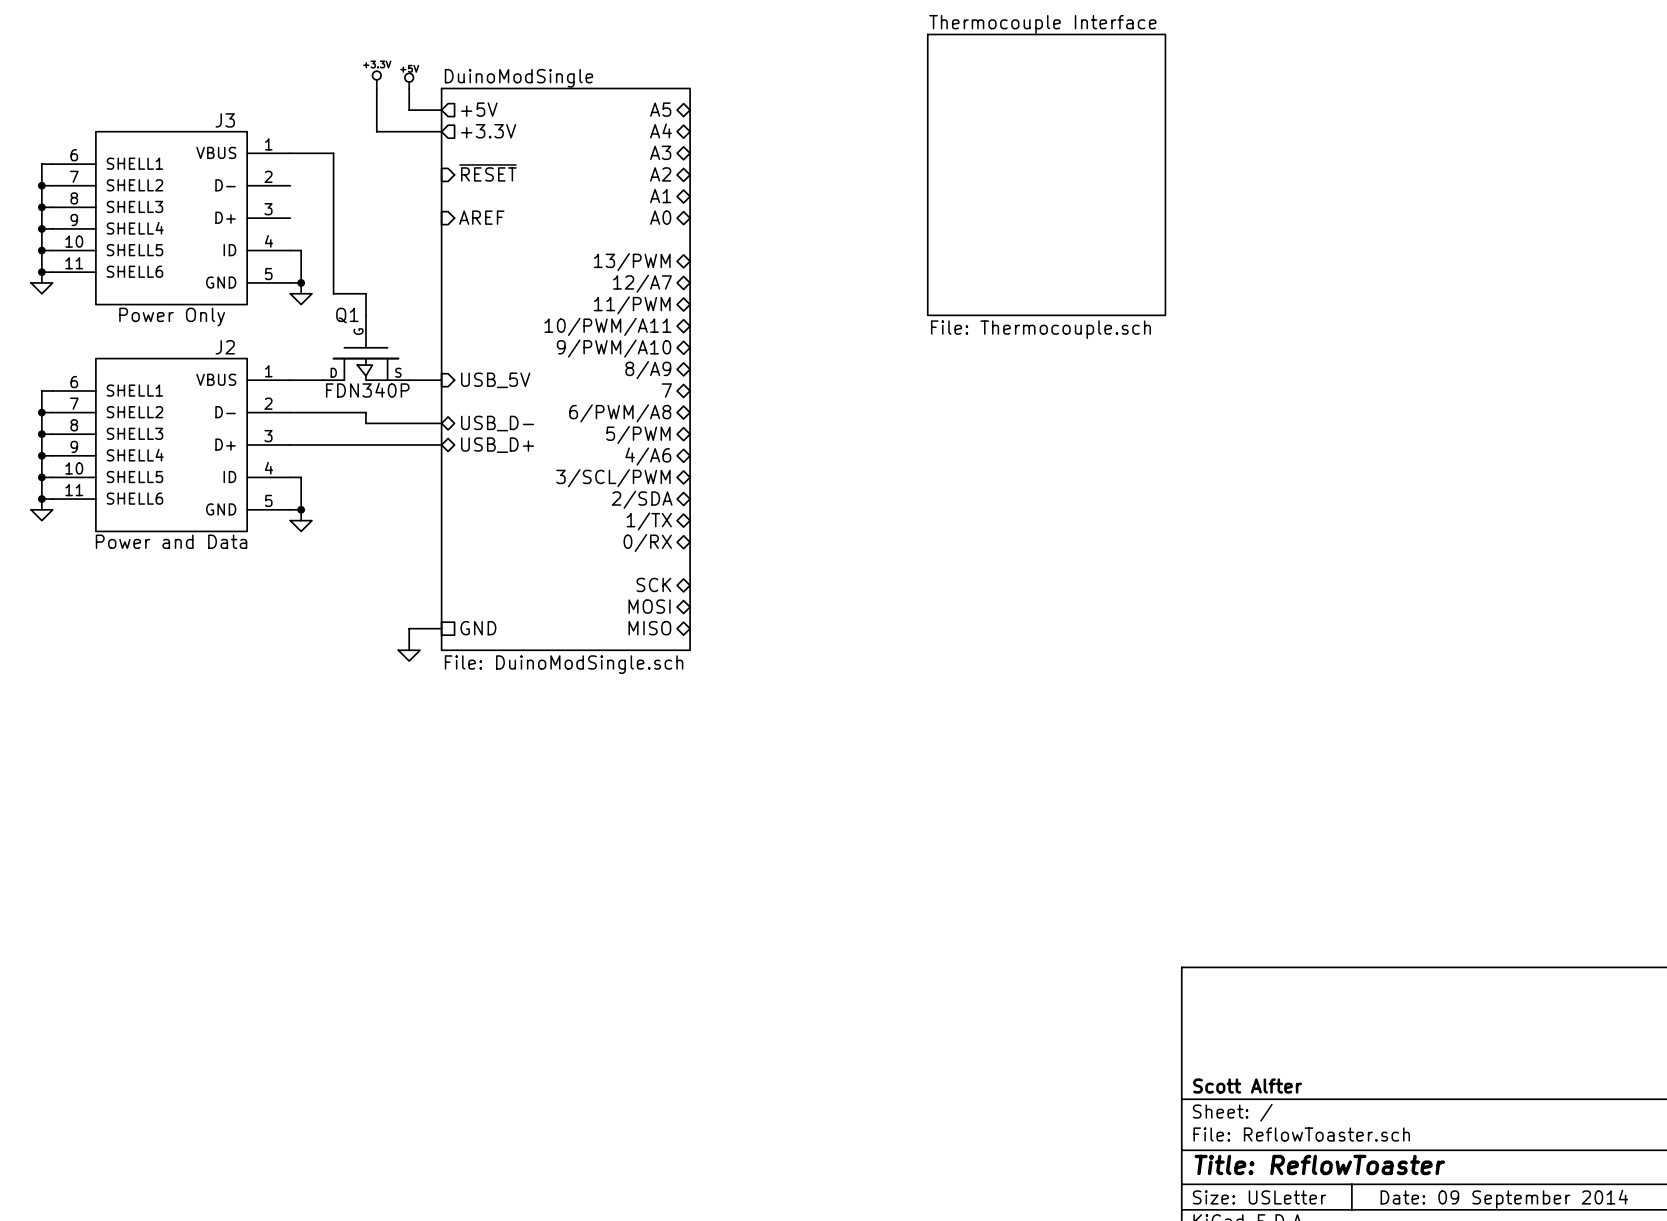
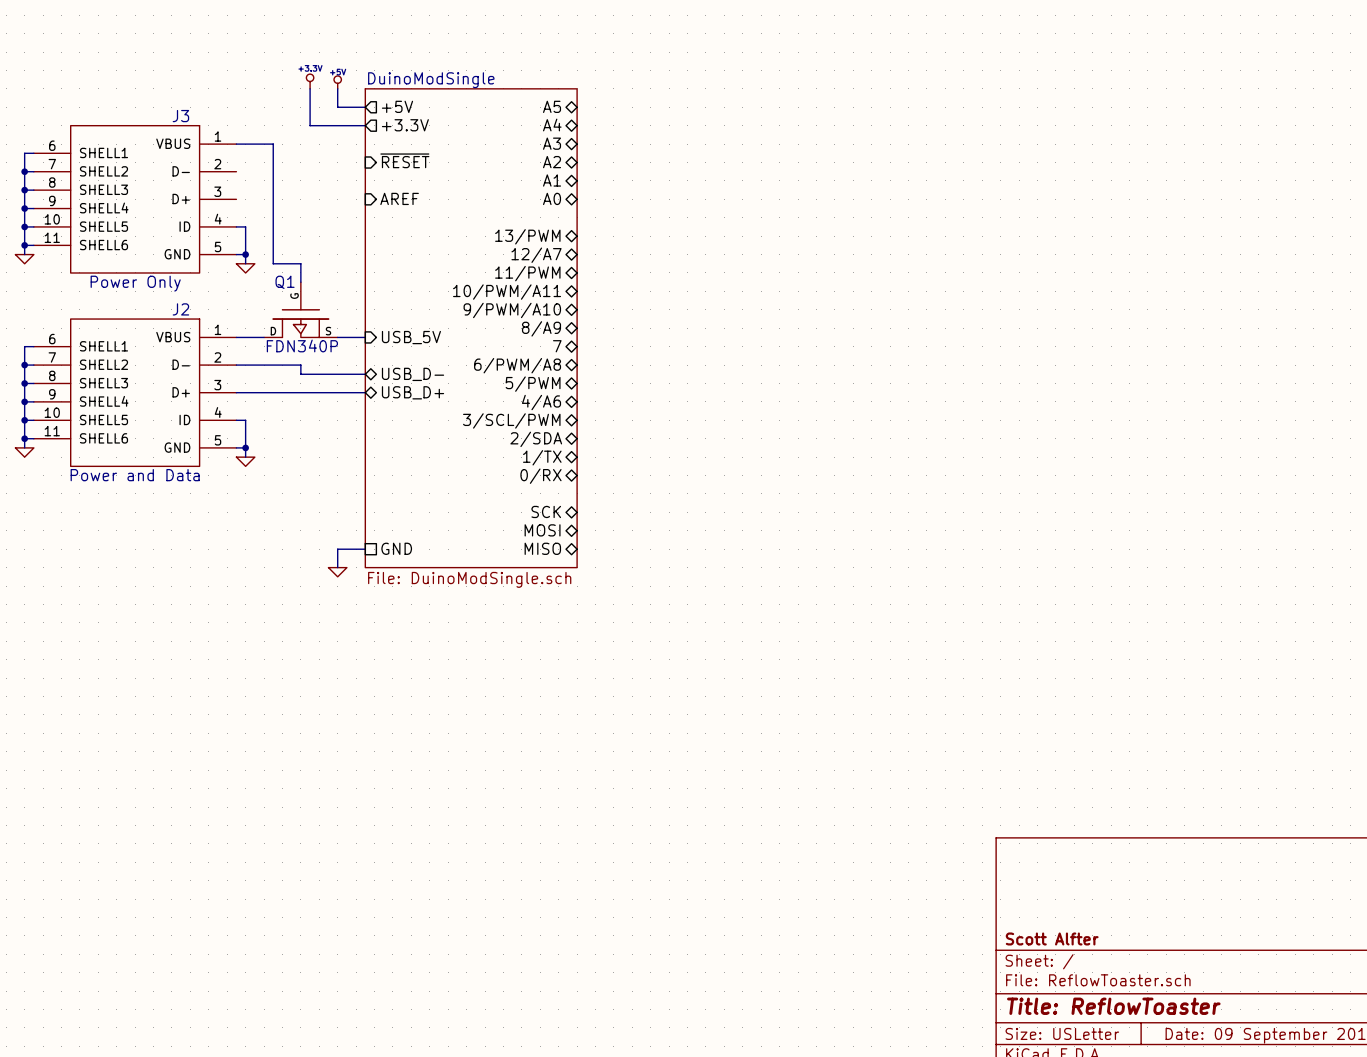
sheet Thermocouple Interface: File: Thermocouple.sch (1046, 174) -> none

